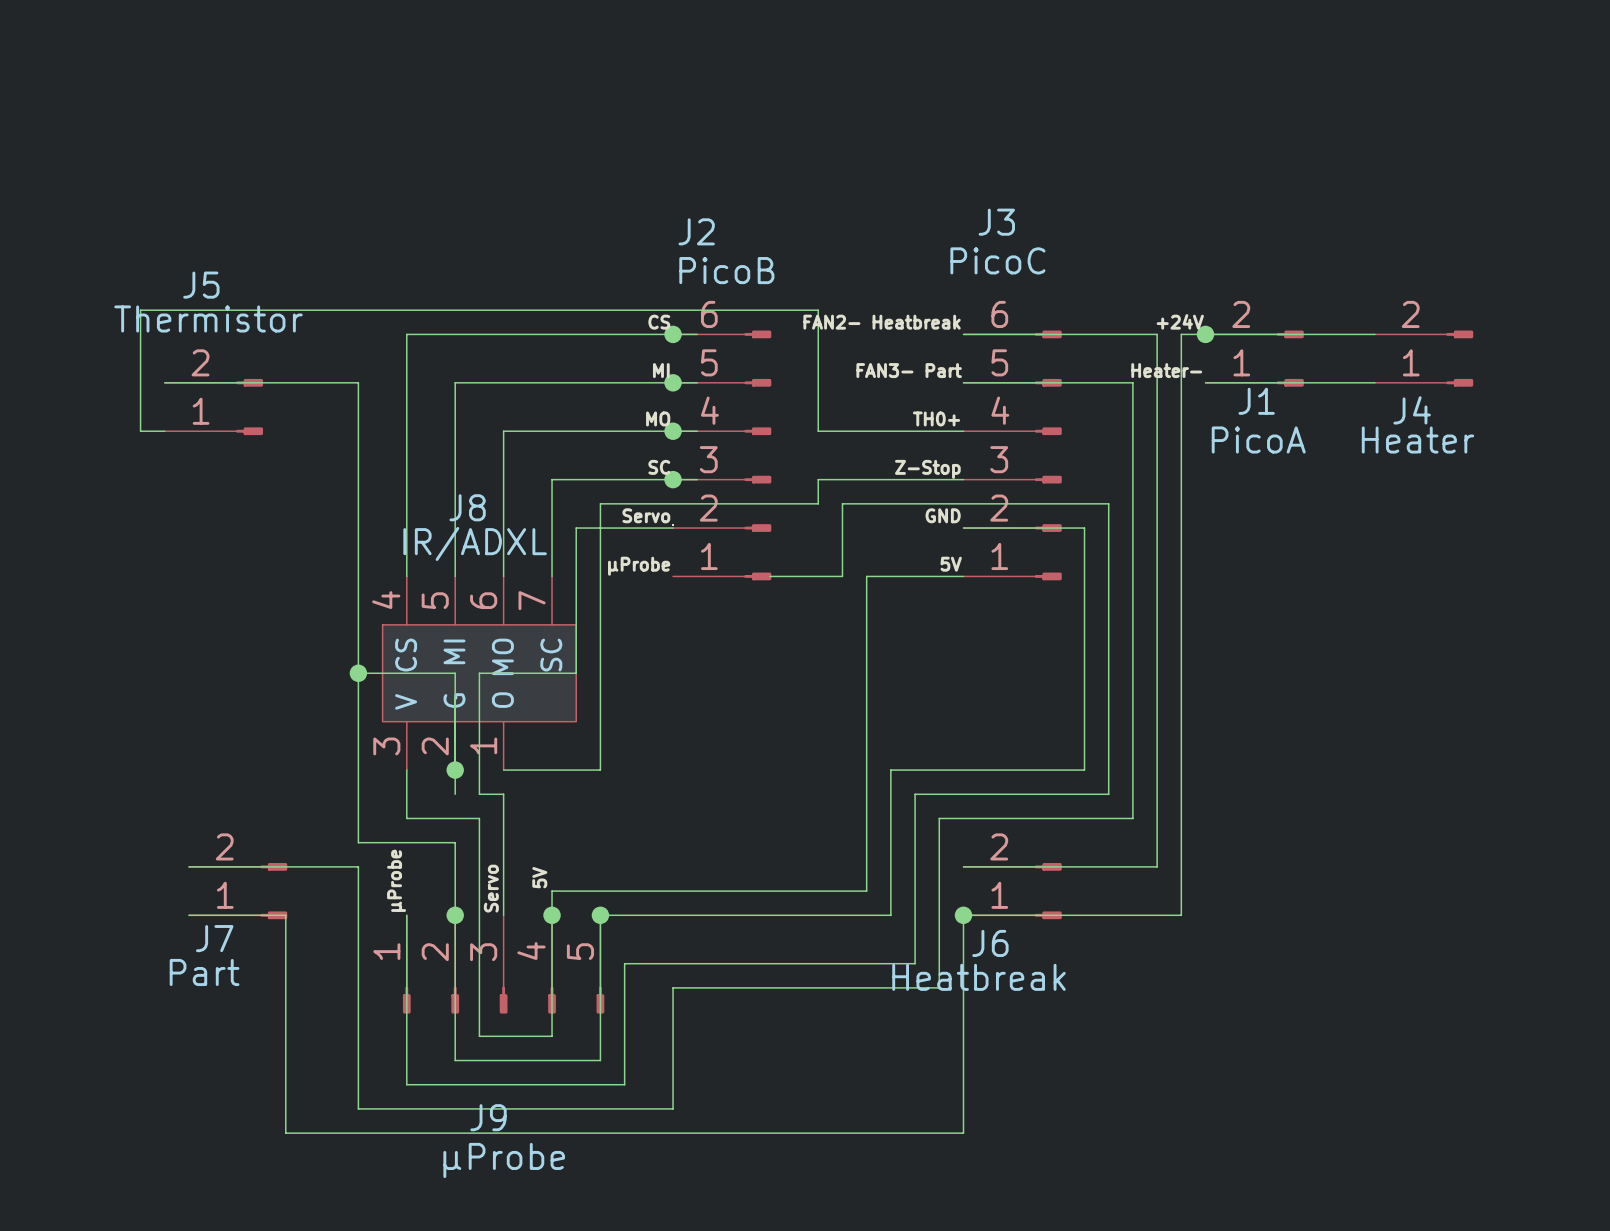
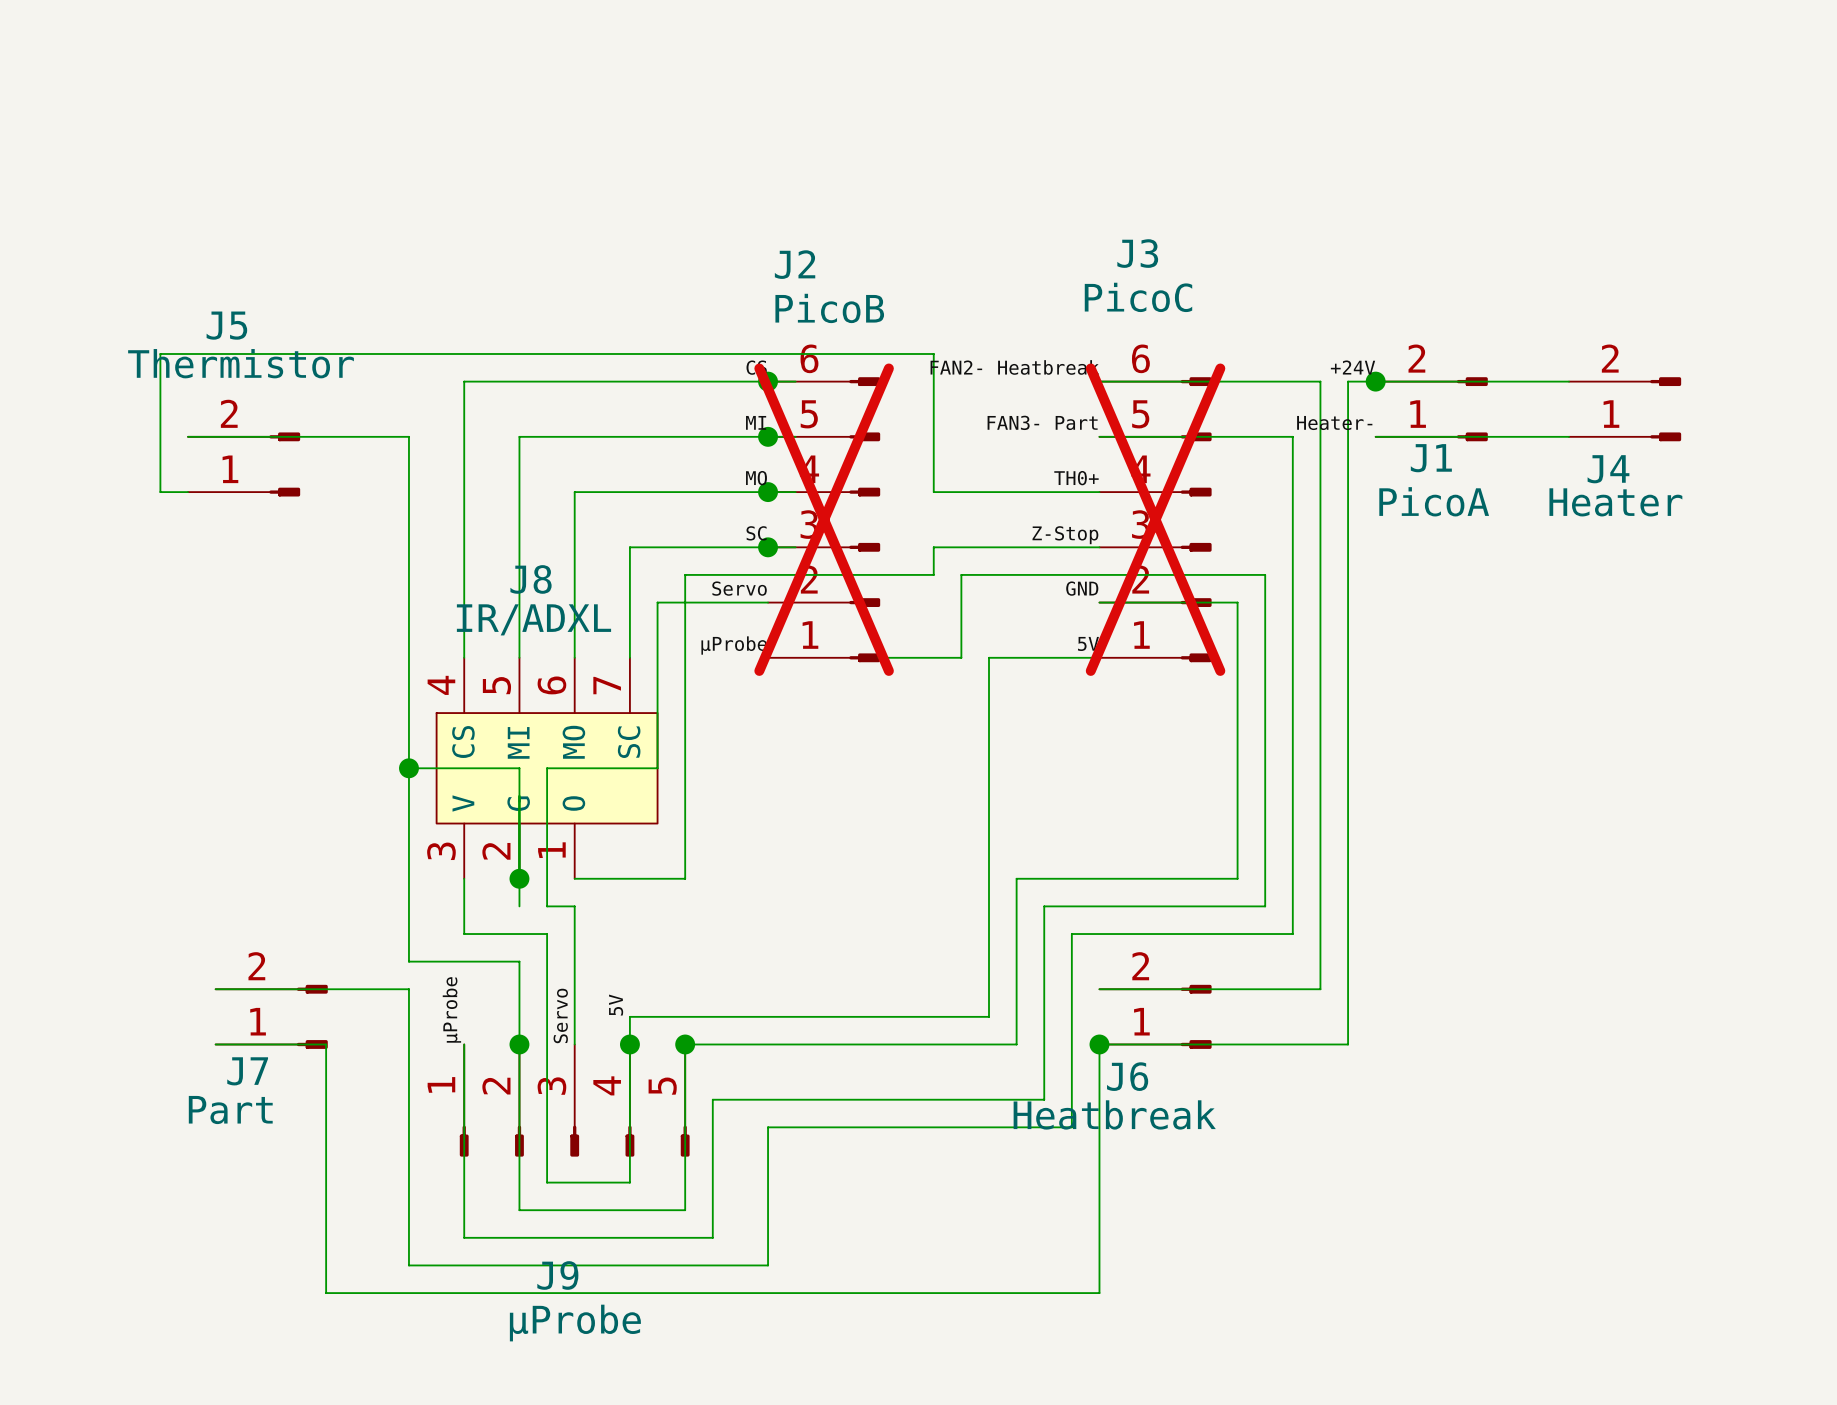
J2 do-not-place cross: none -> (824, 519)
J3 do-not-place cross: none -> (1155, 519)

